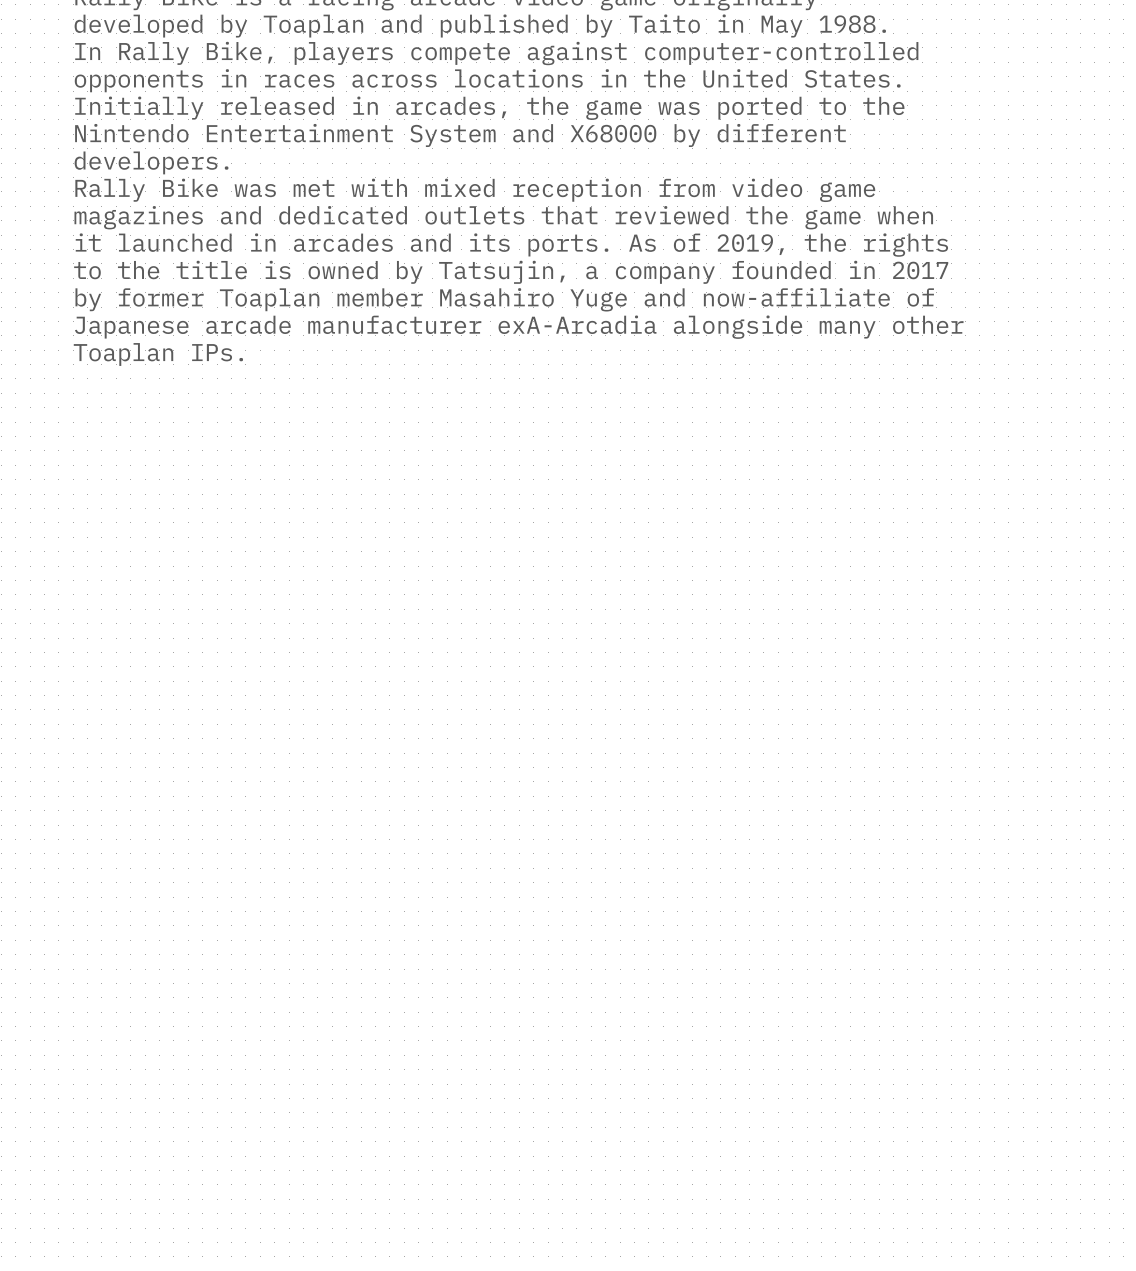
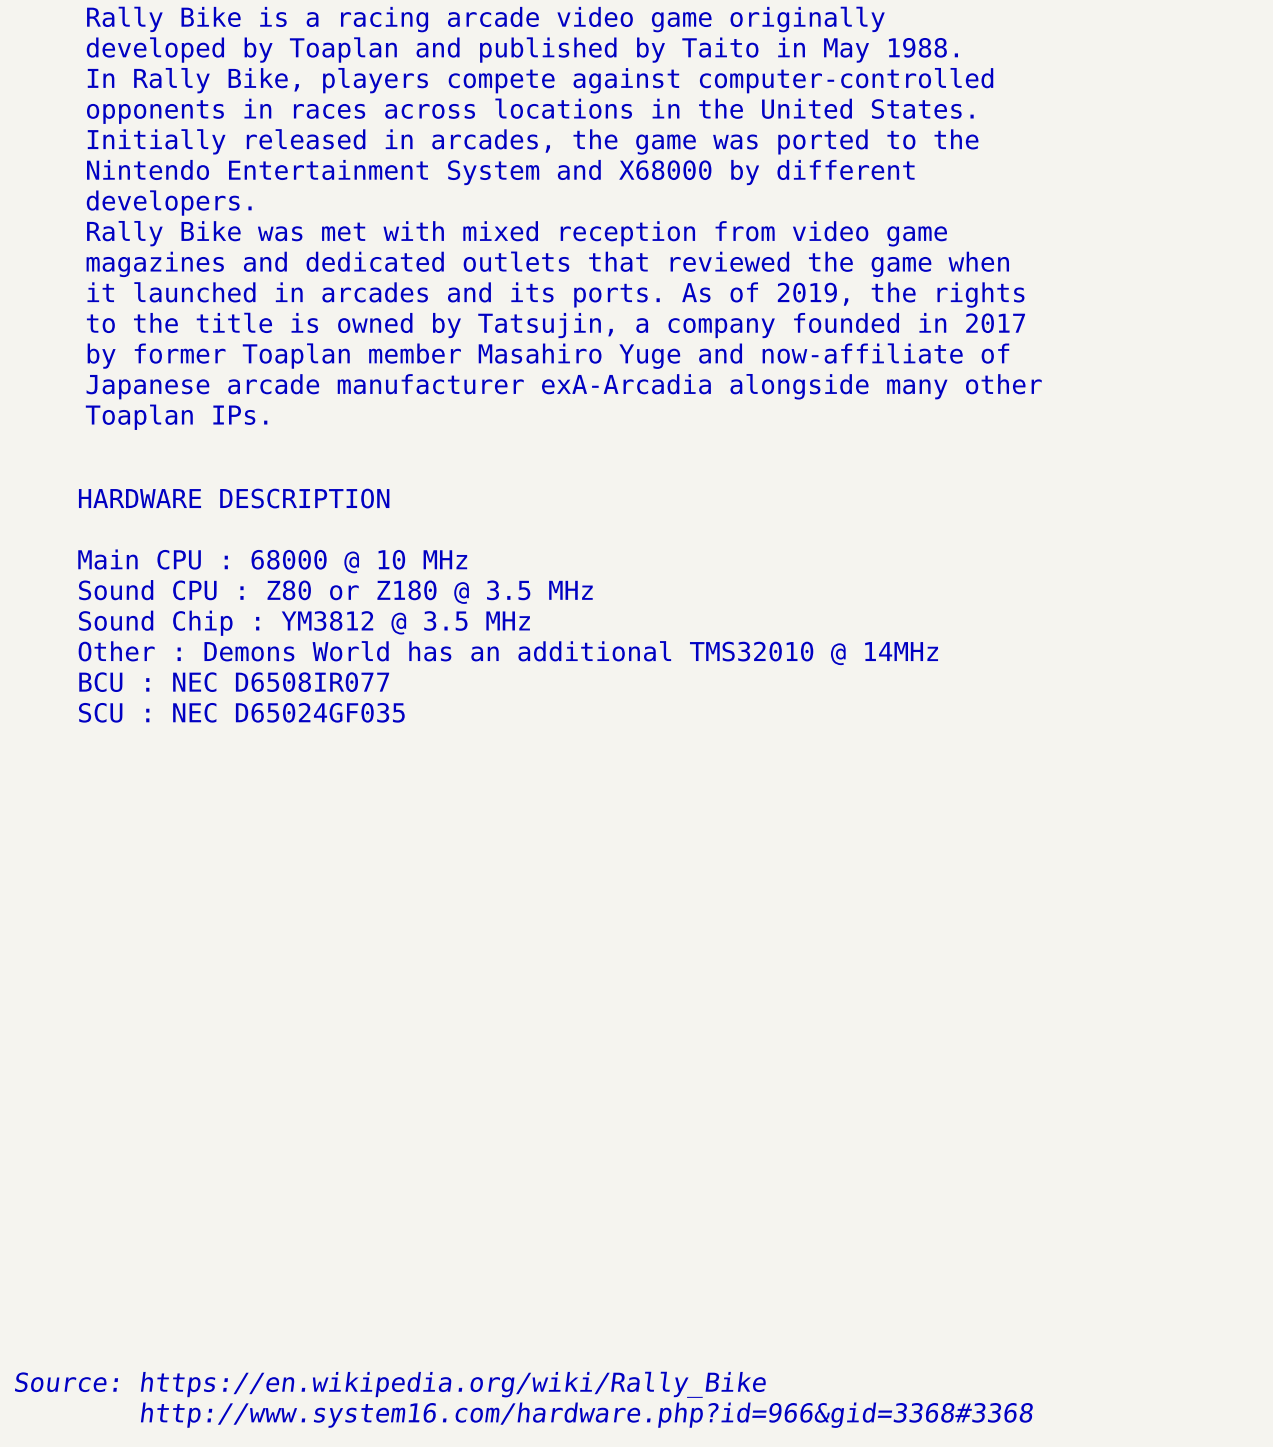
text: none -> HARDWARE DESCRIPTION (234, 498)
text: none -> Main CPU : 68000 @ 10 MHz (272, 561)
text: none -> Sound CPU : Z80 or Z180 @ 3.5 MHz (335, 591)
text: none -> Sound Chip : YM3812 @ 3.5 MHz (304, 623)
text: none -> Other : Demons World has an additional TMS32010 @ 14MHz (508, 653)
text: none -> BCU : NEC D6508IR077 (234, 682)
text: none -> SCU : NEC D65024GF035 (241, 712)
text: none -> Source: https://en.wikipedia.org/wiki/Rally_Bike (390, 1384)
text: none -> http://www.system16.com/hardware.php?id=966&gid=3368#3368 (586, 1415)

